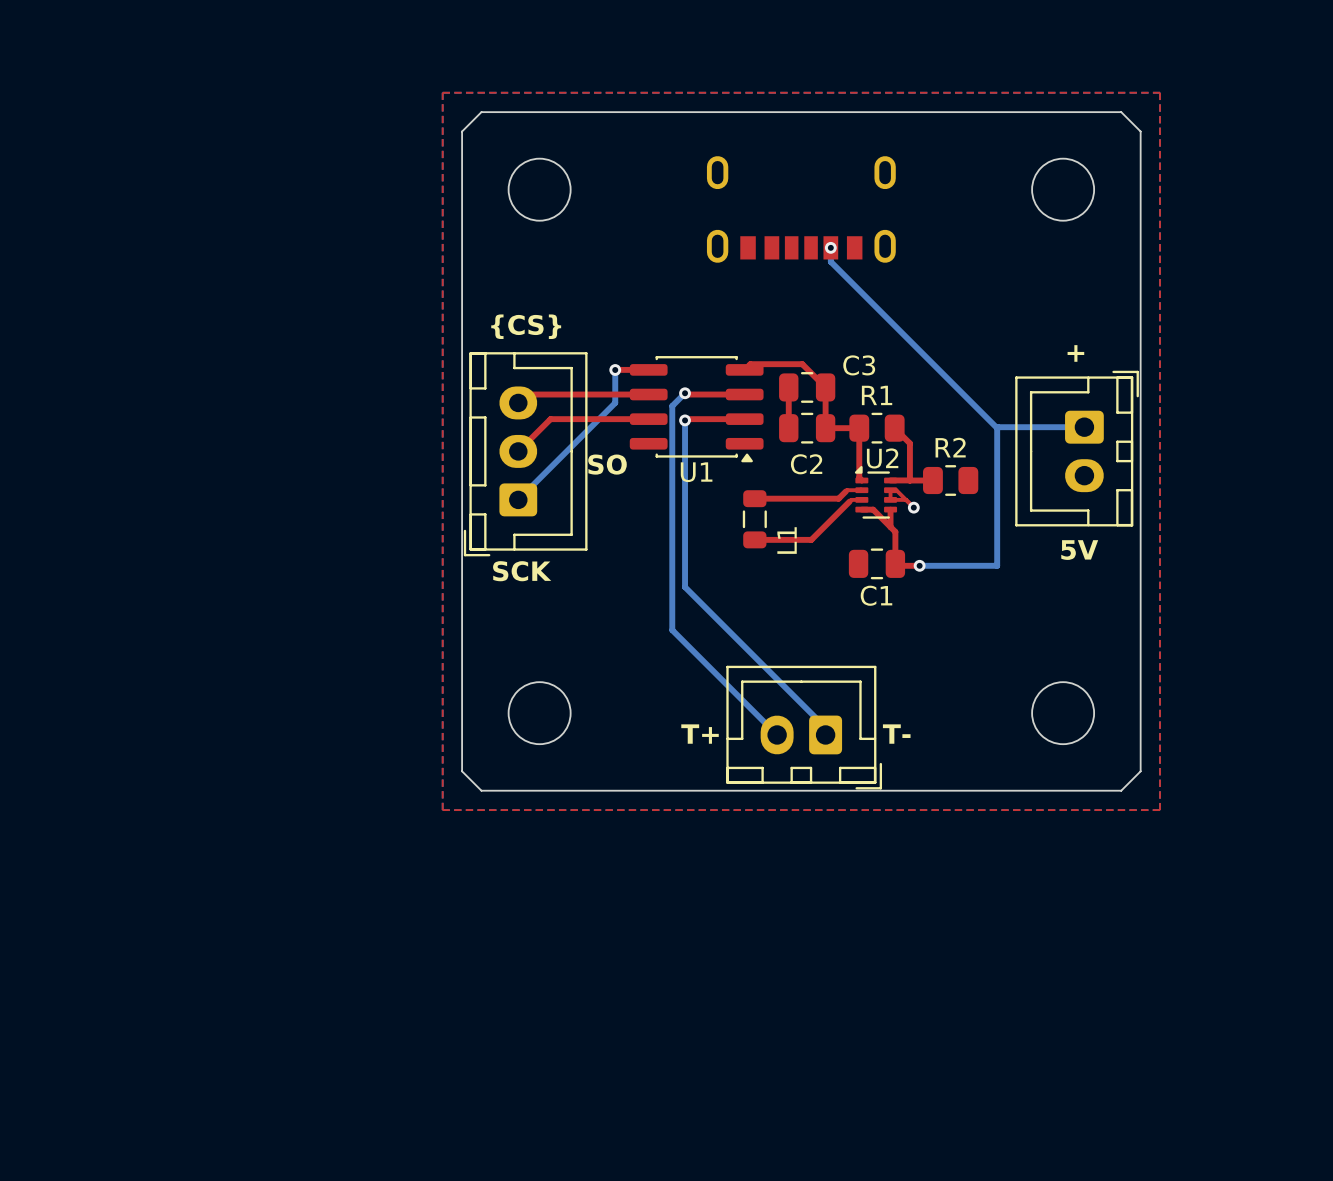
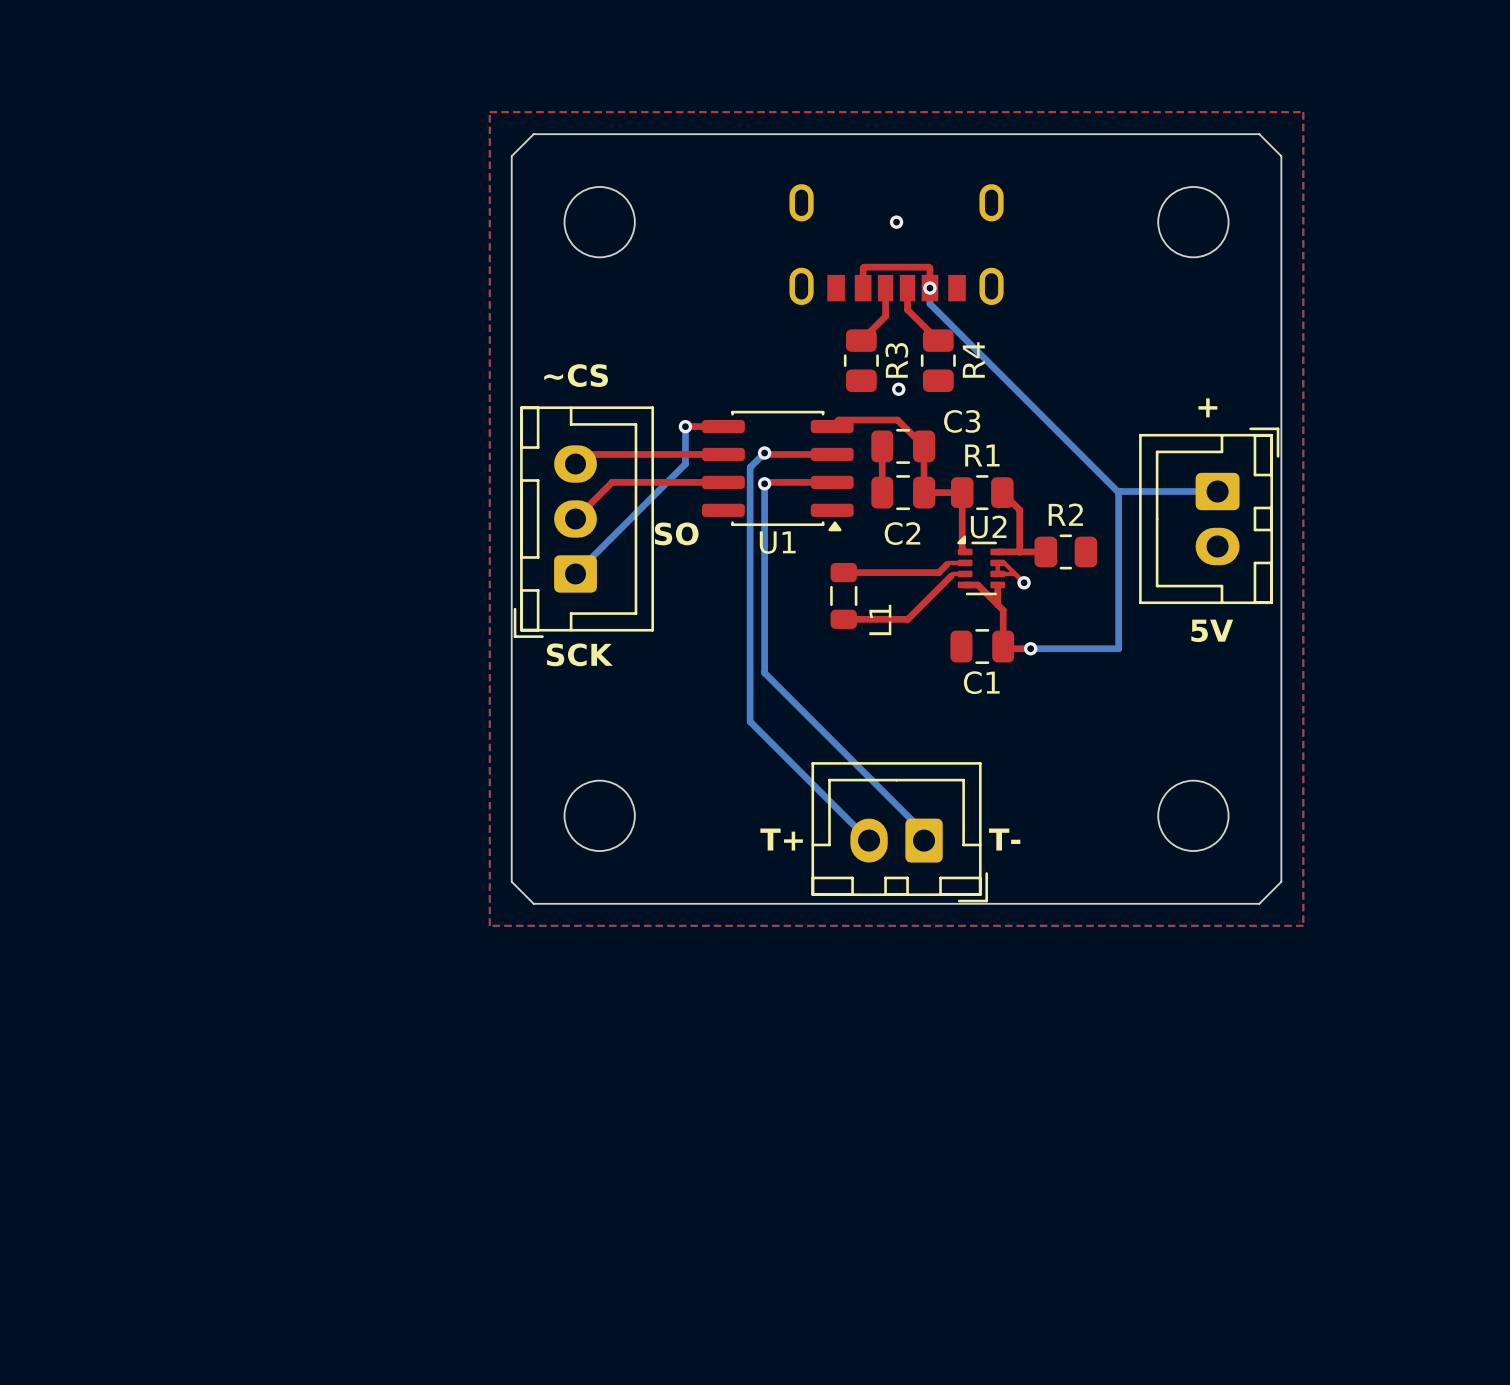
via: none -> (896, 222)
top track: none -> (863, 288) (864, 267) (928, 267) (929, 288)
top track: none -> (885, 288) (885, 316) (861, 340)
top track: none -> (907, 288) (907, 309) (938, 340)
R3: none -> (861, 360)
R4: none -> (938, 360)
text: {CS} (526, 326) -> ~CS (576, 375)
via: none -> (898, 389)

